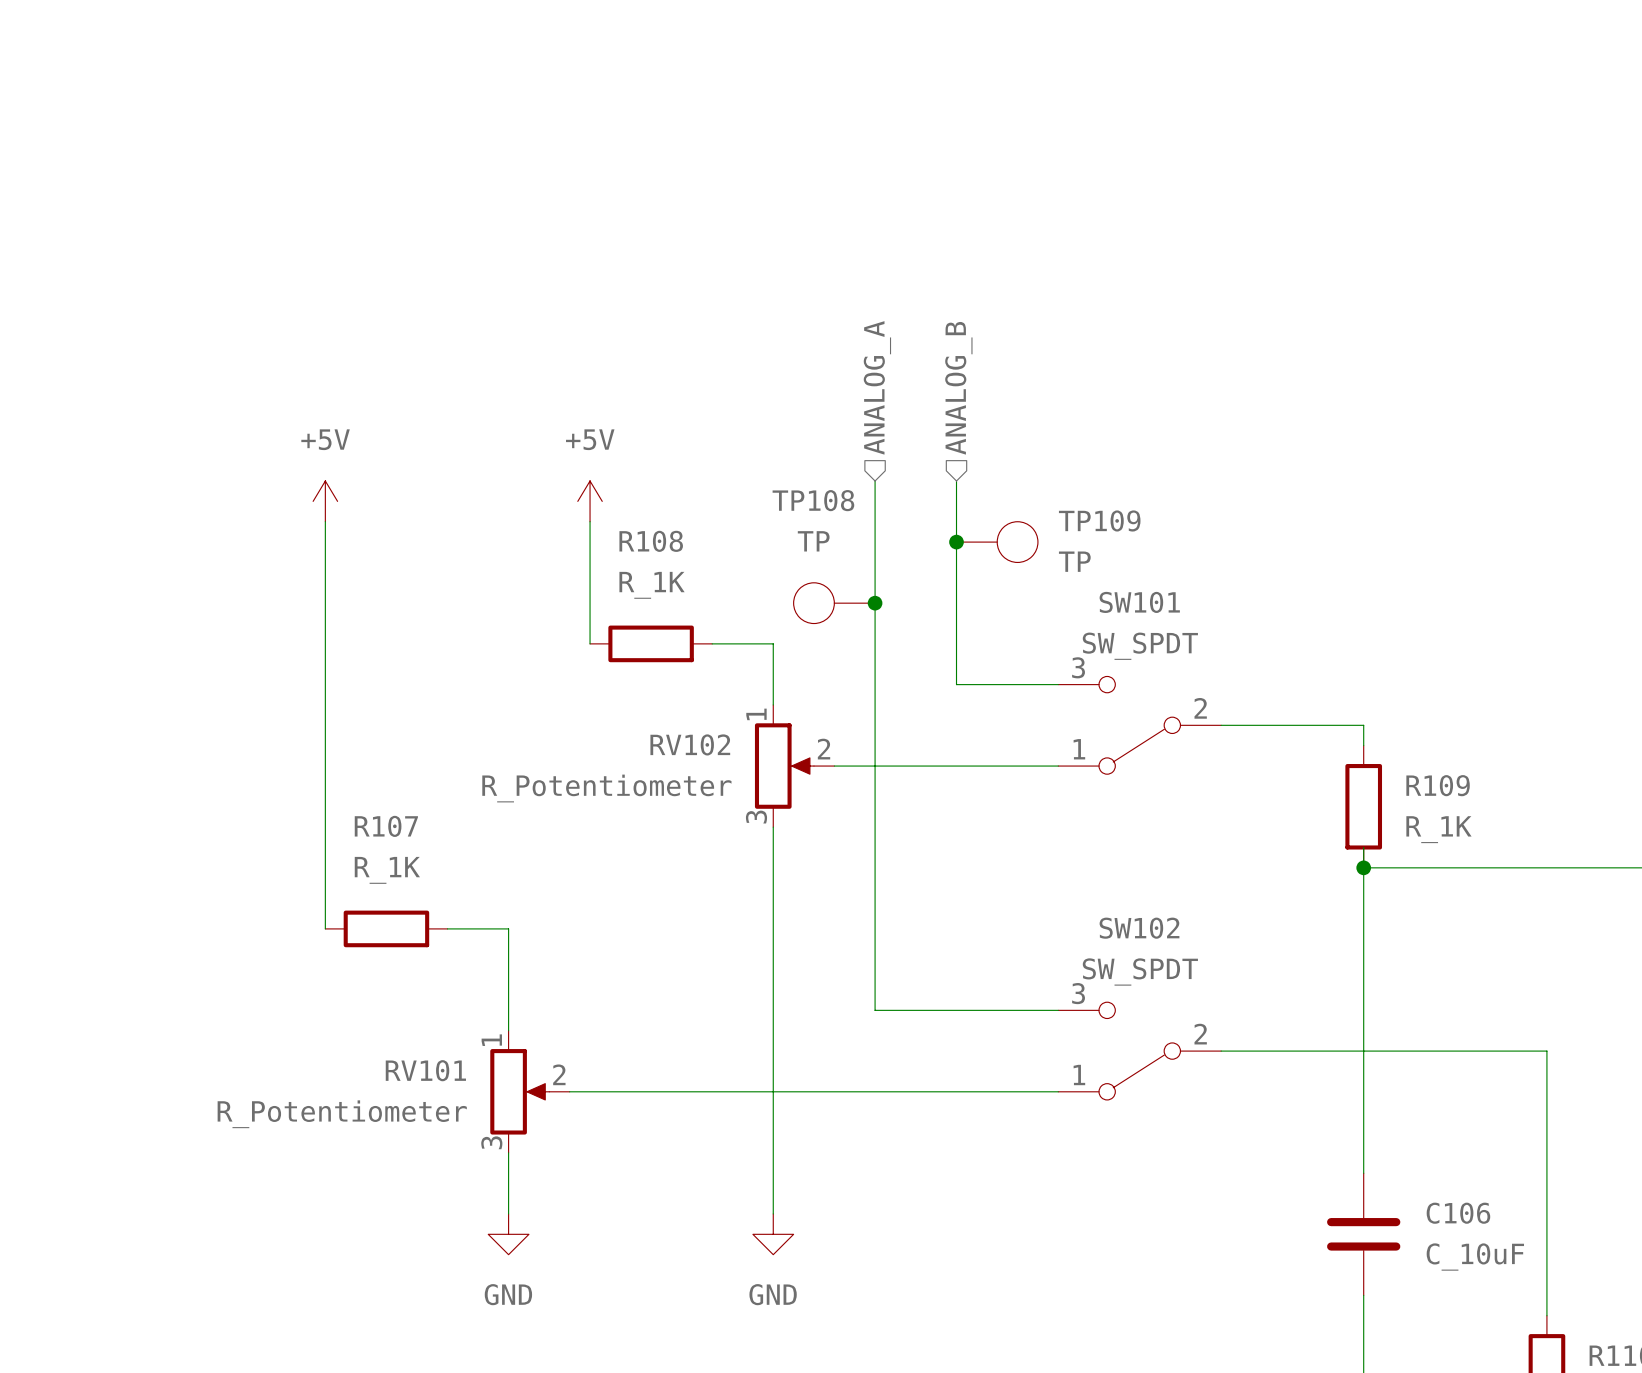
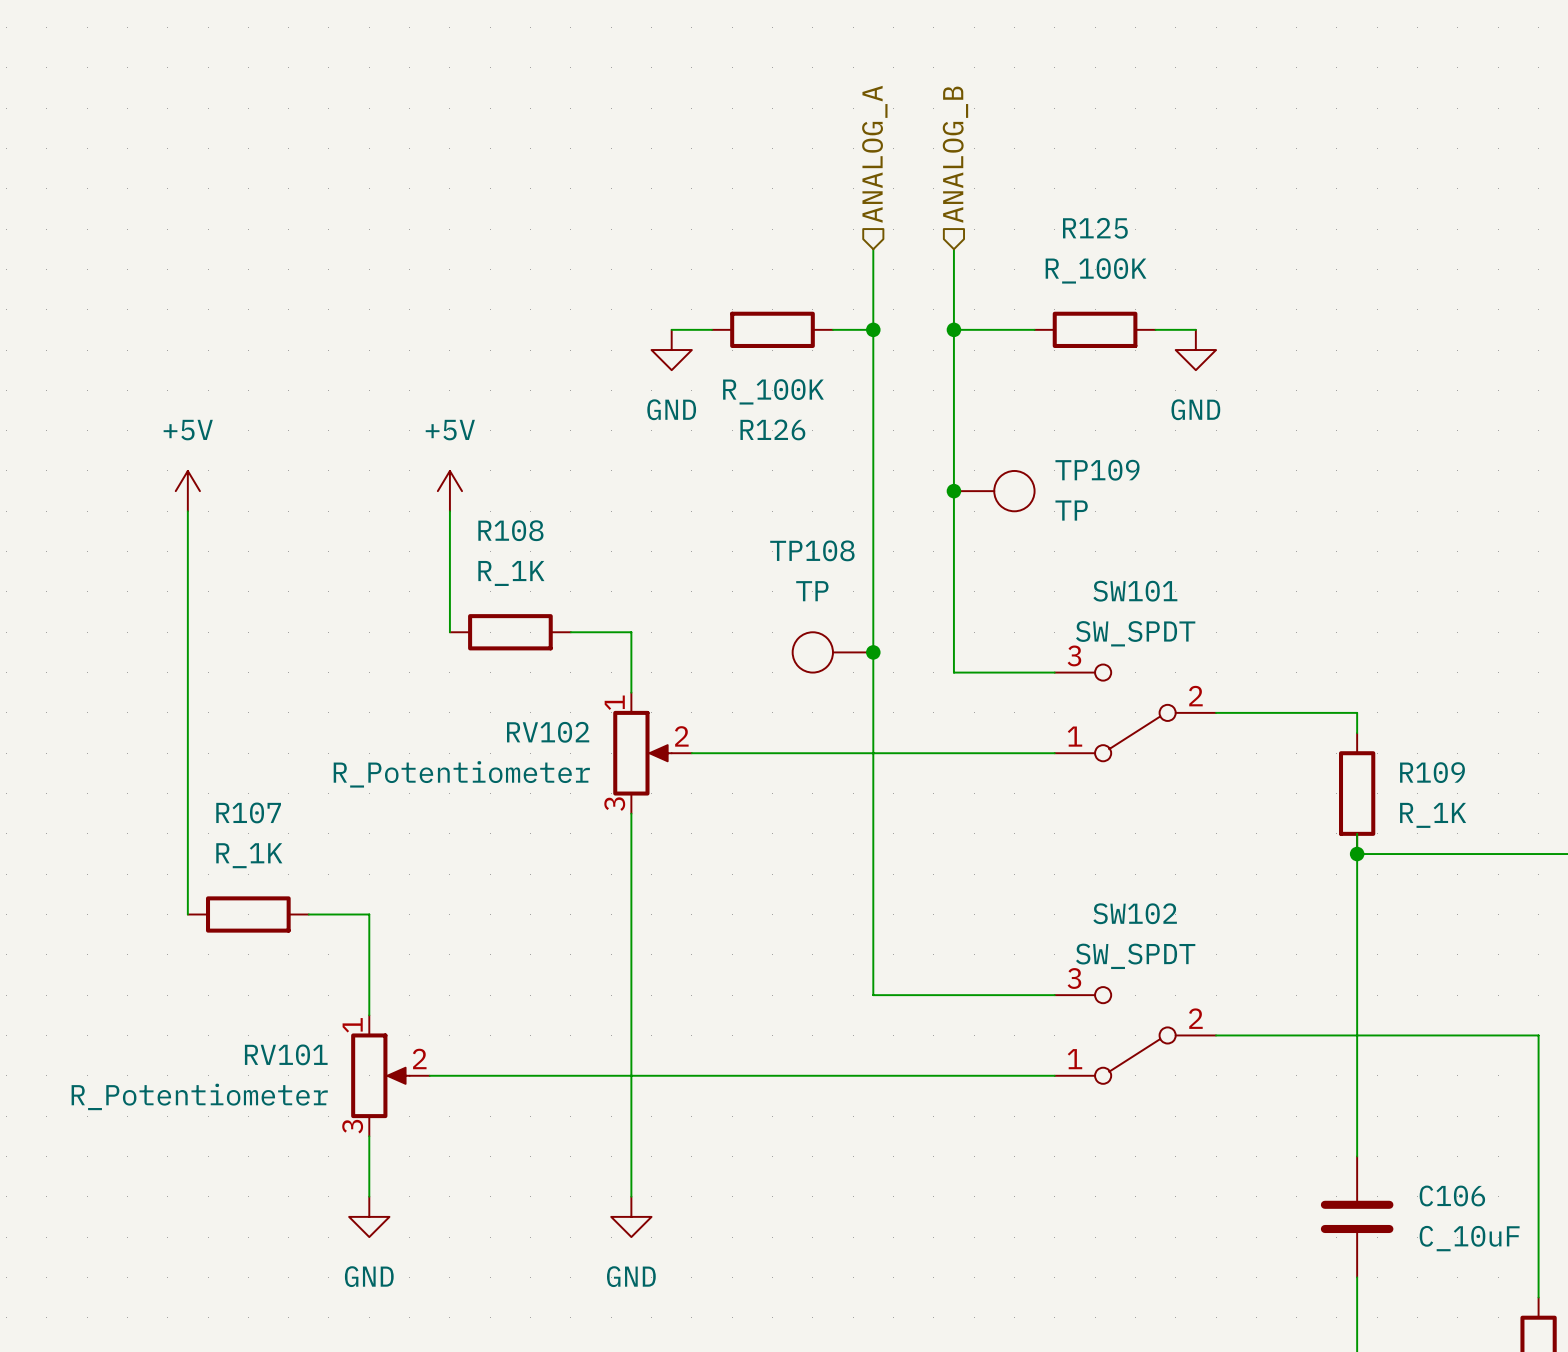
wire: none -> (873, 249) (873, 470)
wire: none -> (953, 249) (953, 470)
wire: none -> (671, 329) (712, 329)
R126: none -> R_100K (772, 329)
wire: none -> (832, 329) (873, 329)
junction: none -> (873, 329)
wire: none -> (953, 329) (1034, 329)
junction: none -> (953, 329)
R125: none -> R_100K (1095, 329)
wire: none -> (1155, 329) (1195, 329)
power symbol: none -> GND (671, 350)
power symbol: none -> GND (1195, 350)
hierarchical label position: ANALOG_A (877, 387) -> ANALOG_A (874, 154)
hierarchical label position: ANALOG_B (958, 388) -> ANALOG_B (955, 154)
power symbol: none -> +5V (187, 491)
power symbol: +5V (325, 501) -> none
power symbol: none -> +5V (449, 491)
power symbol: +5V (590, 501) -> none
wire: (325, 521) (325, 928) -> (187, 511) (187, 914)
wire: (590, 521) (590, 643) -> (449, 511) (449, 632)
junction position: (956, 542) -> (953, 491)
TP109 position: (997, 542) -> (994, 491)
TP108 position: (834, 603) -> (832, 652)
junction position: (875, 603) -> (873, 652)
R108 position: (651, 643) -> (510, 632)
wire: (712, 643) (773, 643) (773, 704) -> (570, 632) (631, 632) (631, 692)
wire: none -> (691, 753) (832, 753)
RV102 position: (794, 766) -> (652, 753)
wire: (773, 827) (773, 1213) -> (631, 813) (631, 1196)
R107 position: (386, 928) -> (248, 914)
wire: (447, 928) (508, 928) (508, 1030) -> (308, 914) (369, 914) (369, 1015)
wire: none -> (429, 1075) (570, 1075)
RV101 position: (529, 1091) -> (390, 1075)
wire: (508, 1152) (508, 1213) -> (369, 1136) (369, 1196)
power symbol: none -> GND (369, 1216)
power symbol: GND (508, 1234) -> none
power symbol: none -> GND (631, 1216)
power symbol: GND (773, 1234) -> none

